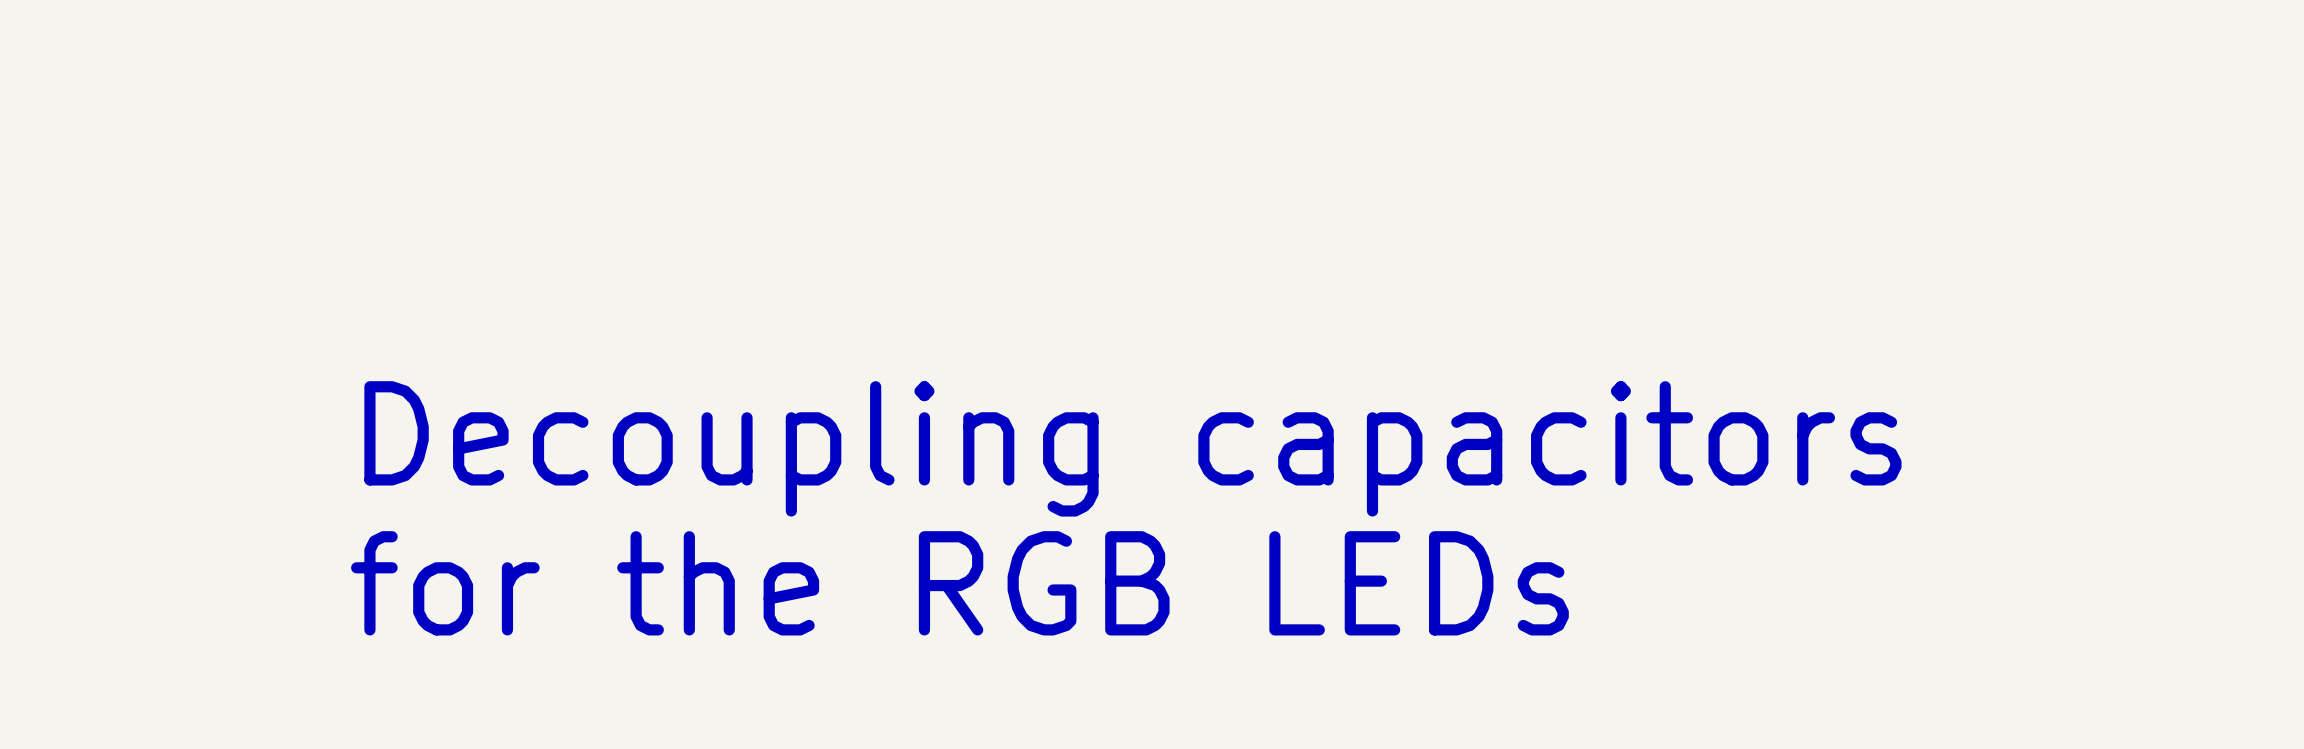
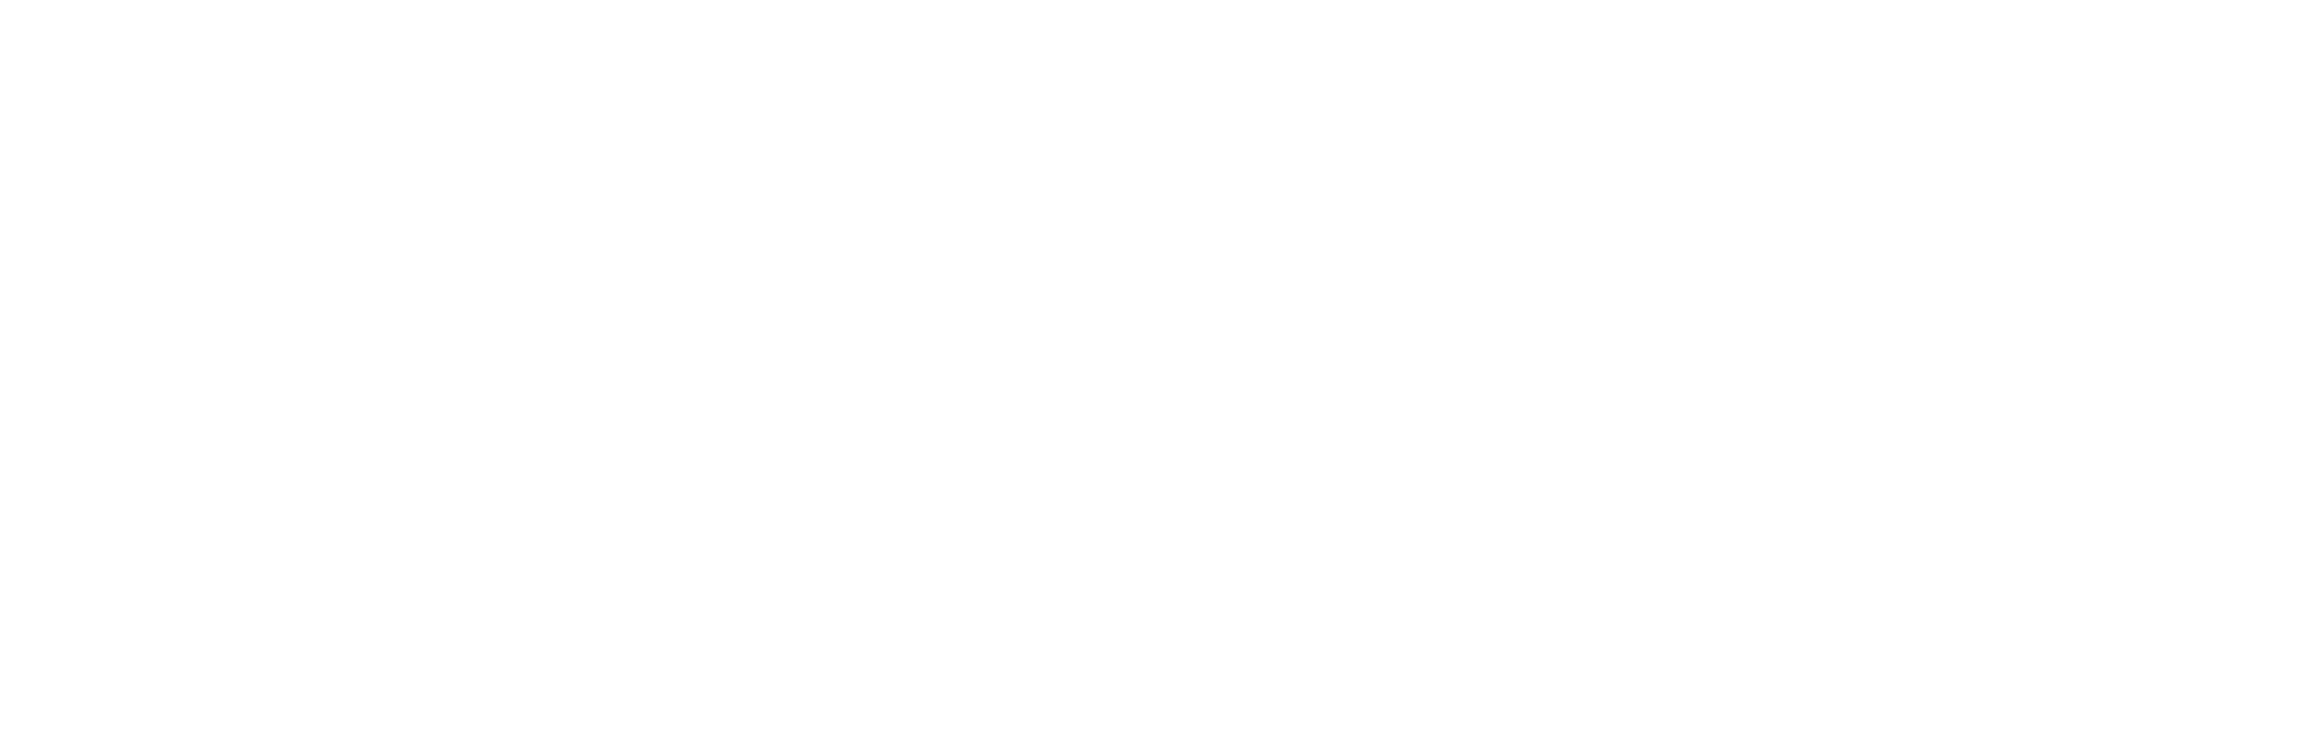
text: Decoupling capacitors (1132, 448) -> none
text: for the RGB LEDs (959, 583) -> none

